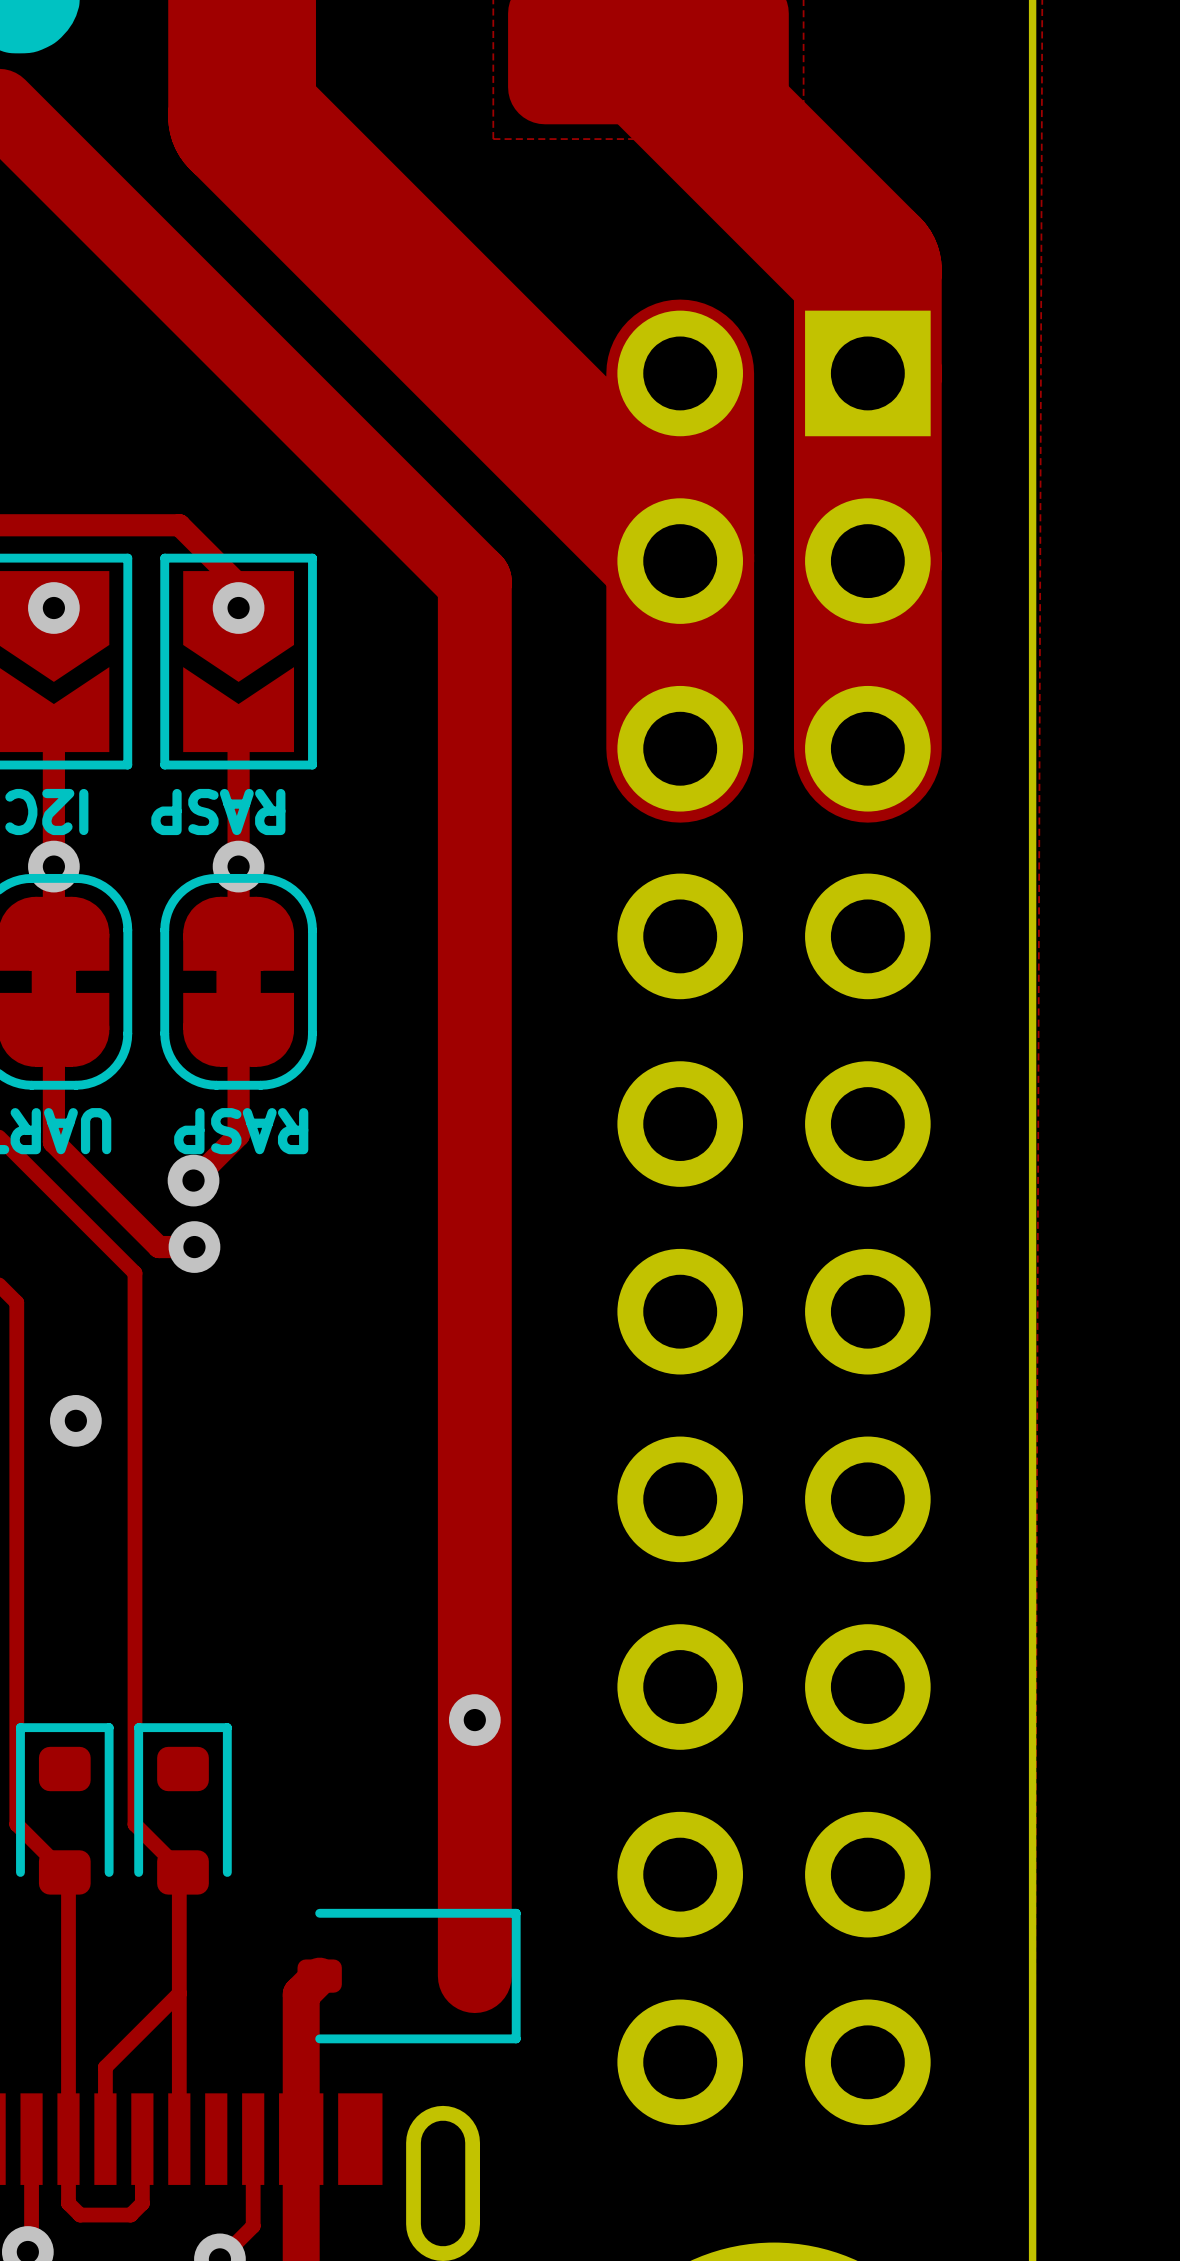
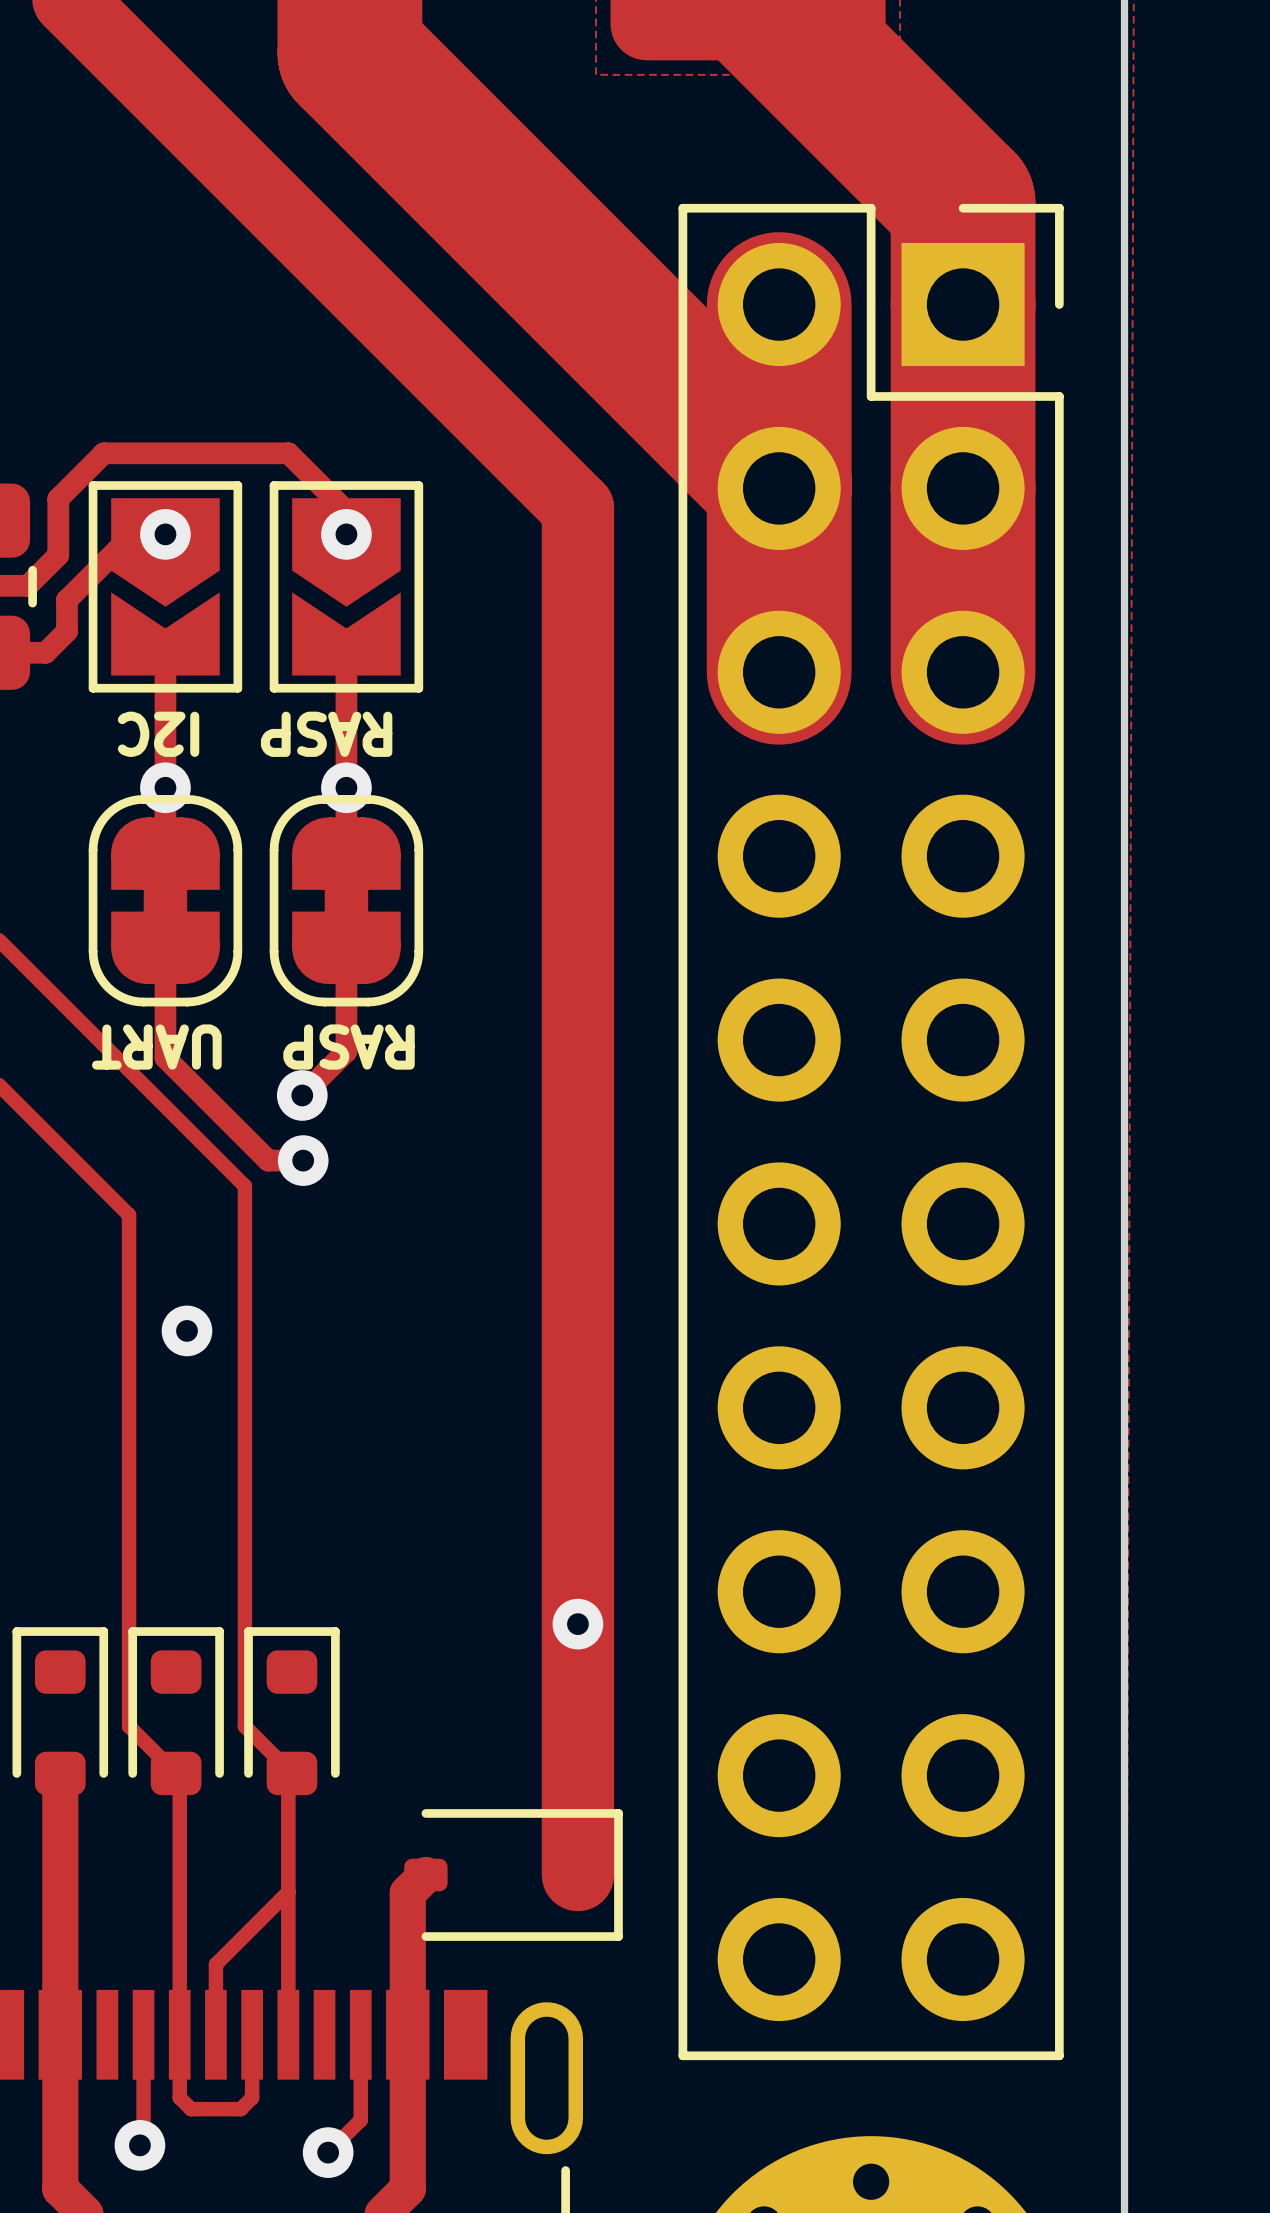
part footprint: [617, 310, 931, 2126] -> [678, 203, 1064, 2061]

